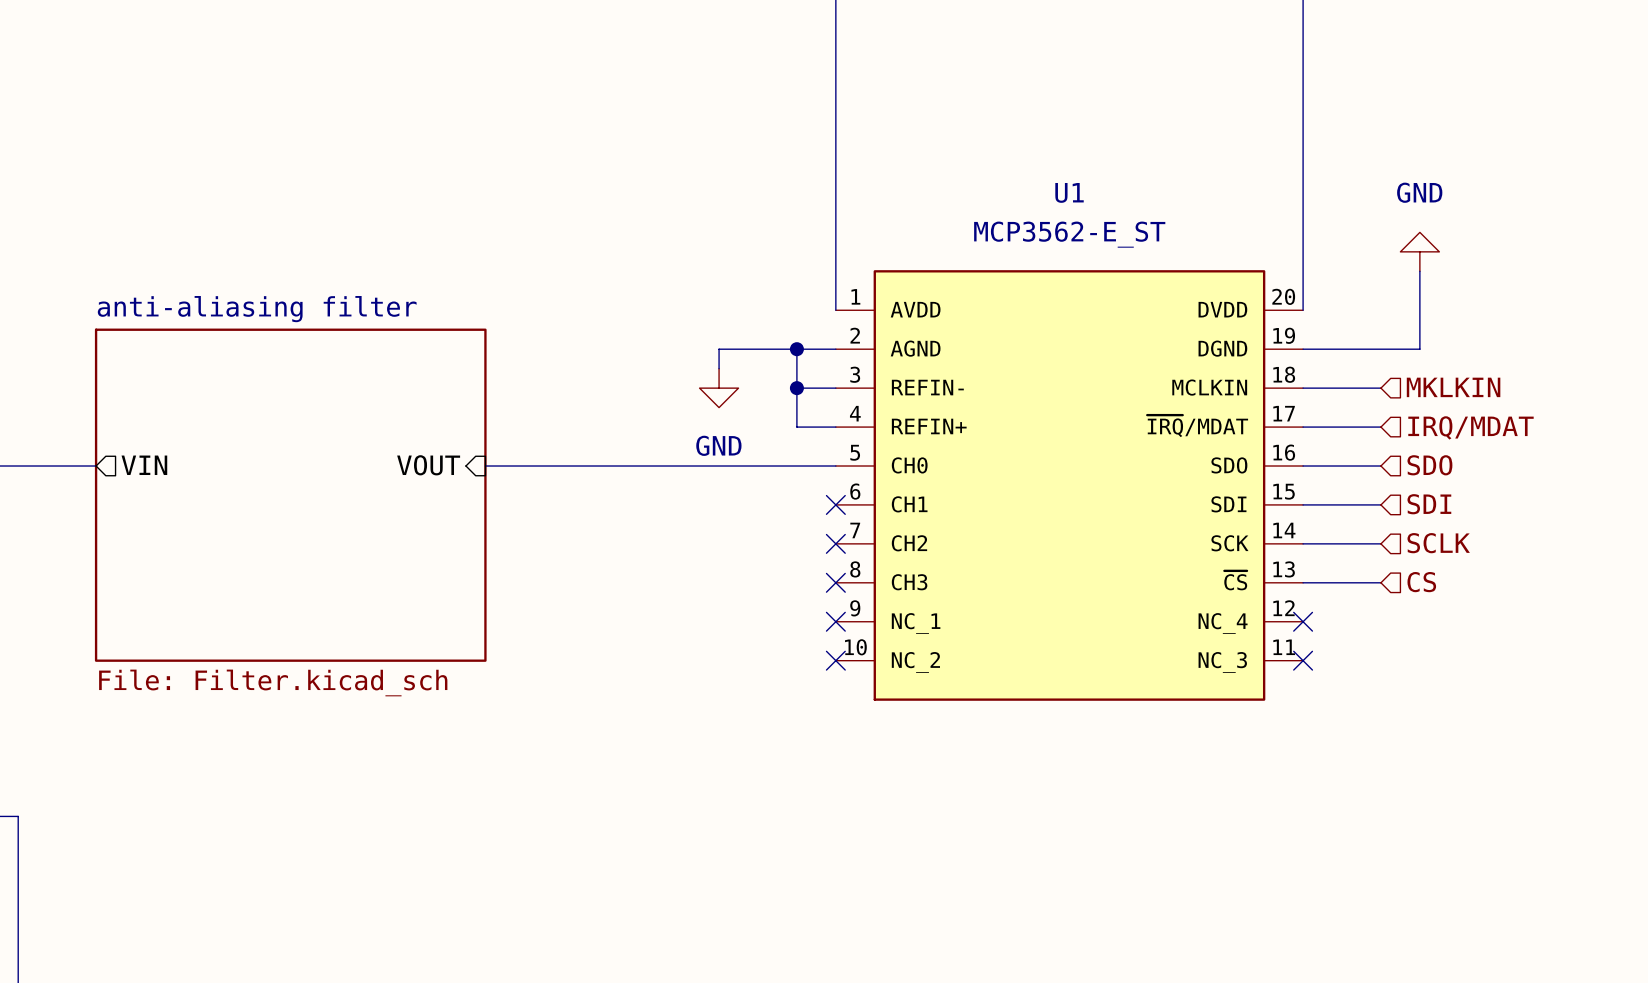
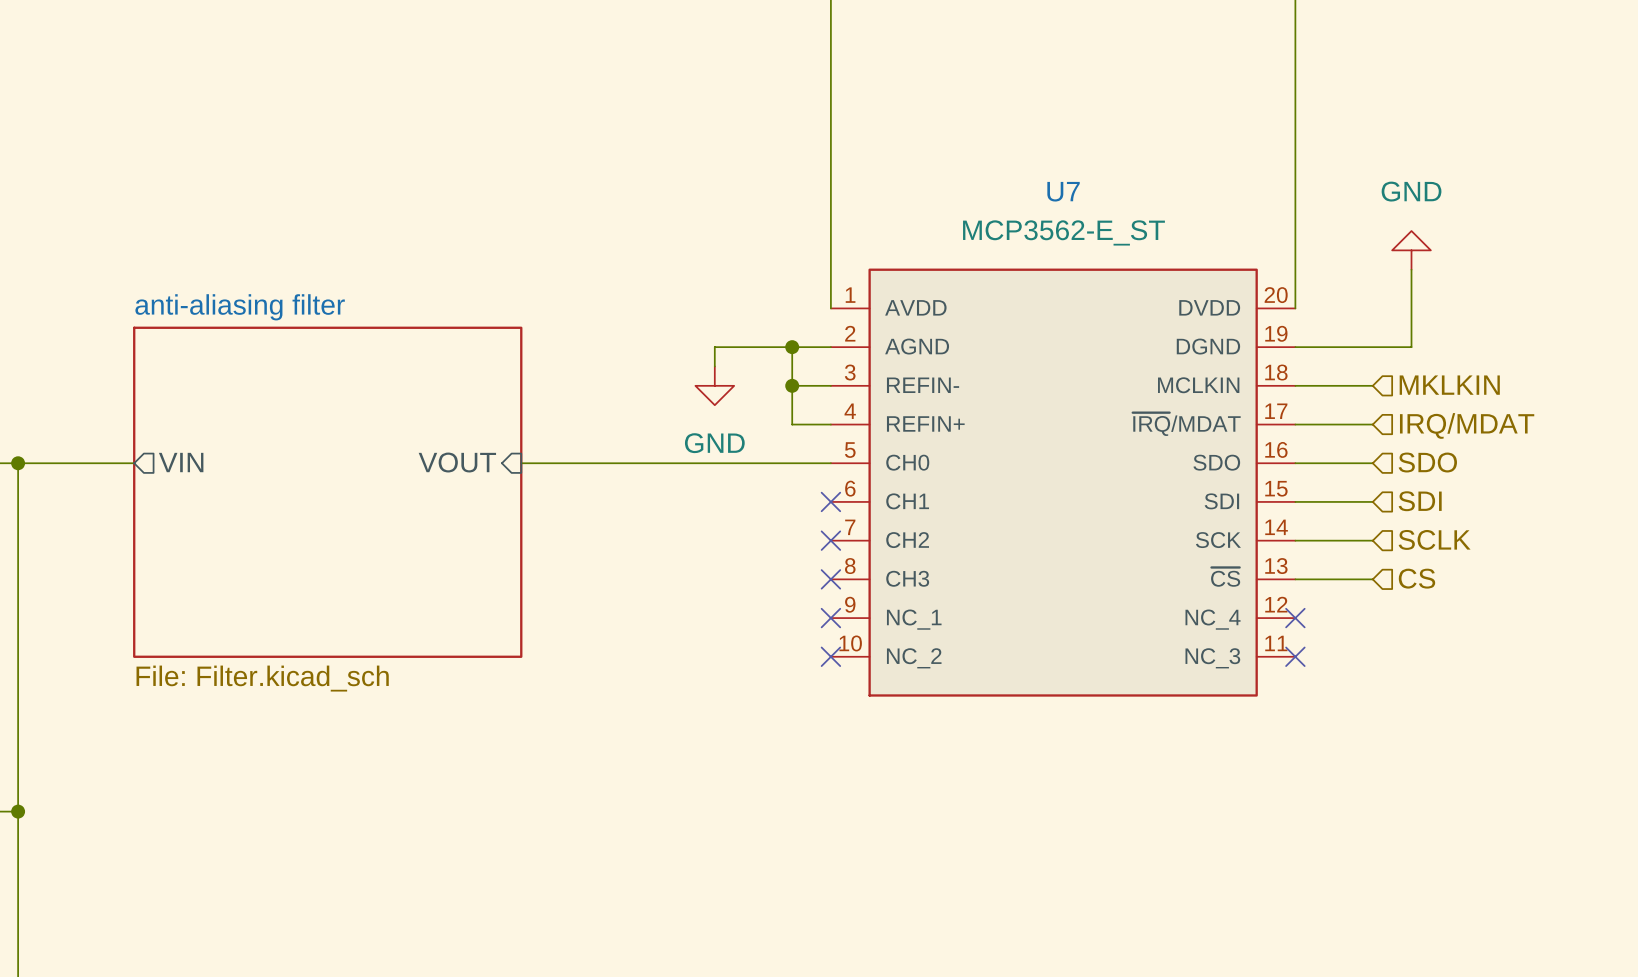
U1 name: U1 (1069, 192) -> U7 (1063, 191)
sheet pin position: VIN (144, 465) -> VIN (181, 462)
sheet pin position: VOUT (428, 465) -> VOUT (457, 462)
wire: none -> (18, 463) (18, 811)
junction: none -> (18, 463)
wire: none -> (95, 463) (134, 463)
wire: (485, 466) (524, 466) -> none
sheet anti-aliasing filter position: (290, 495) -> (327, 492)
junction: none -> (18, 811)

